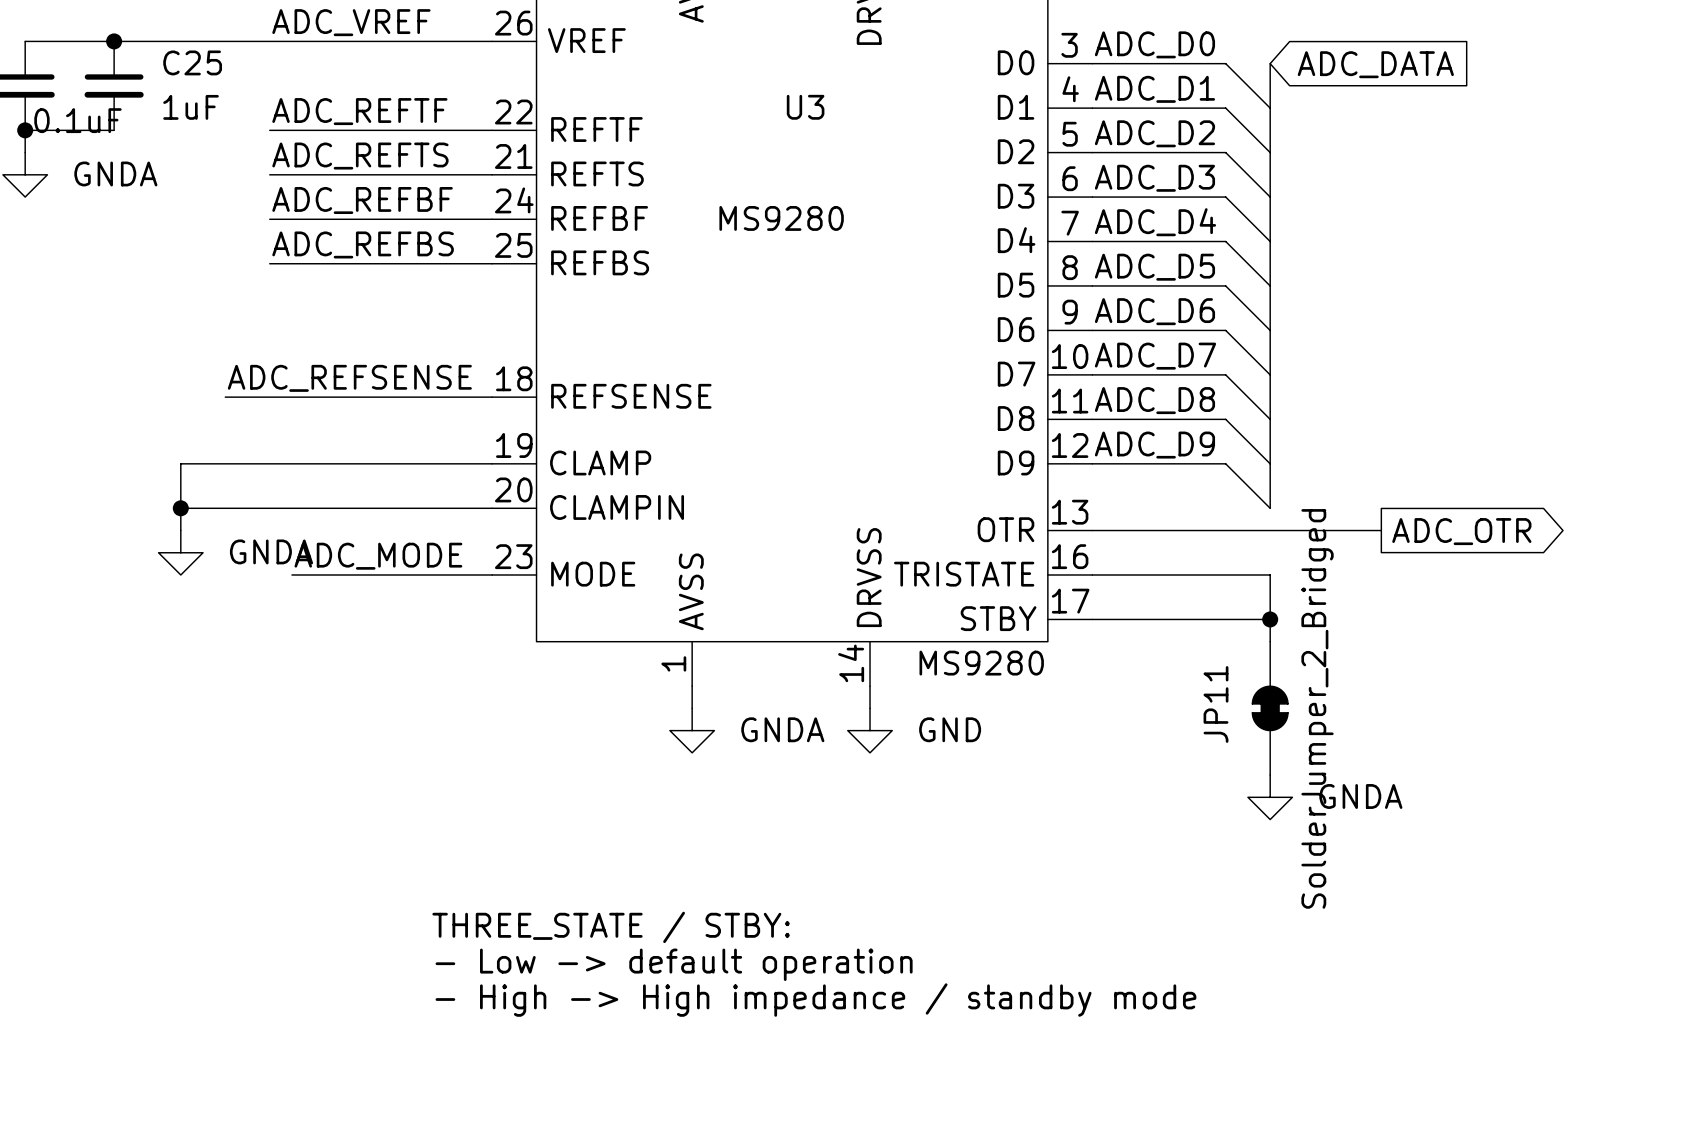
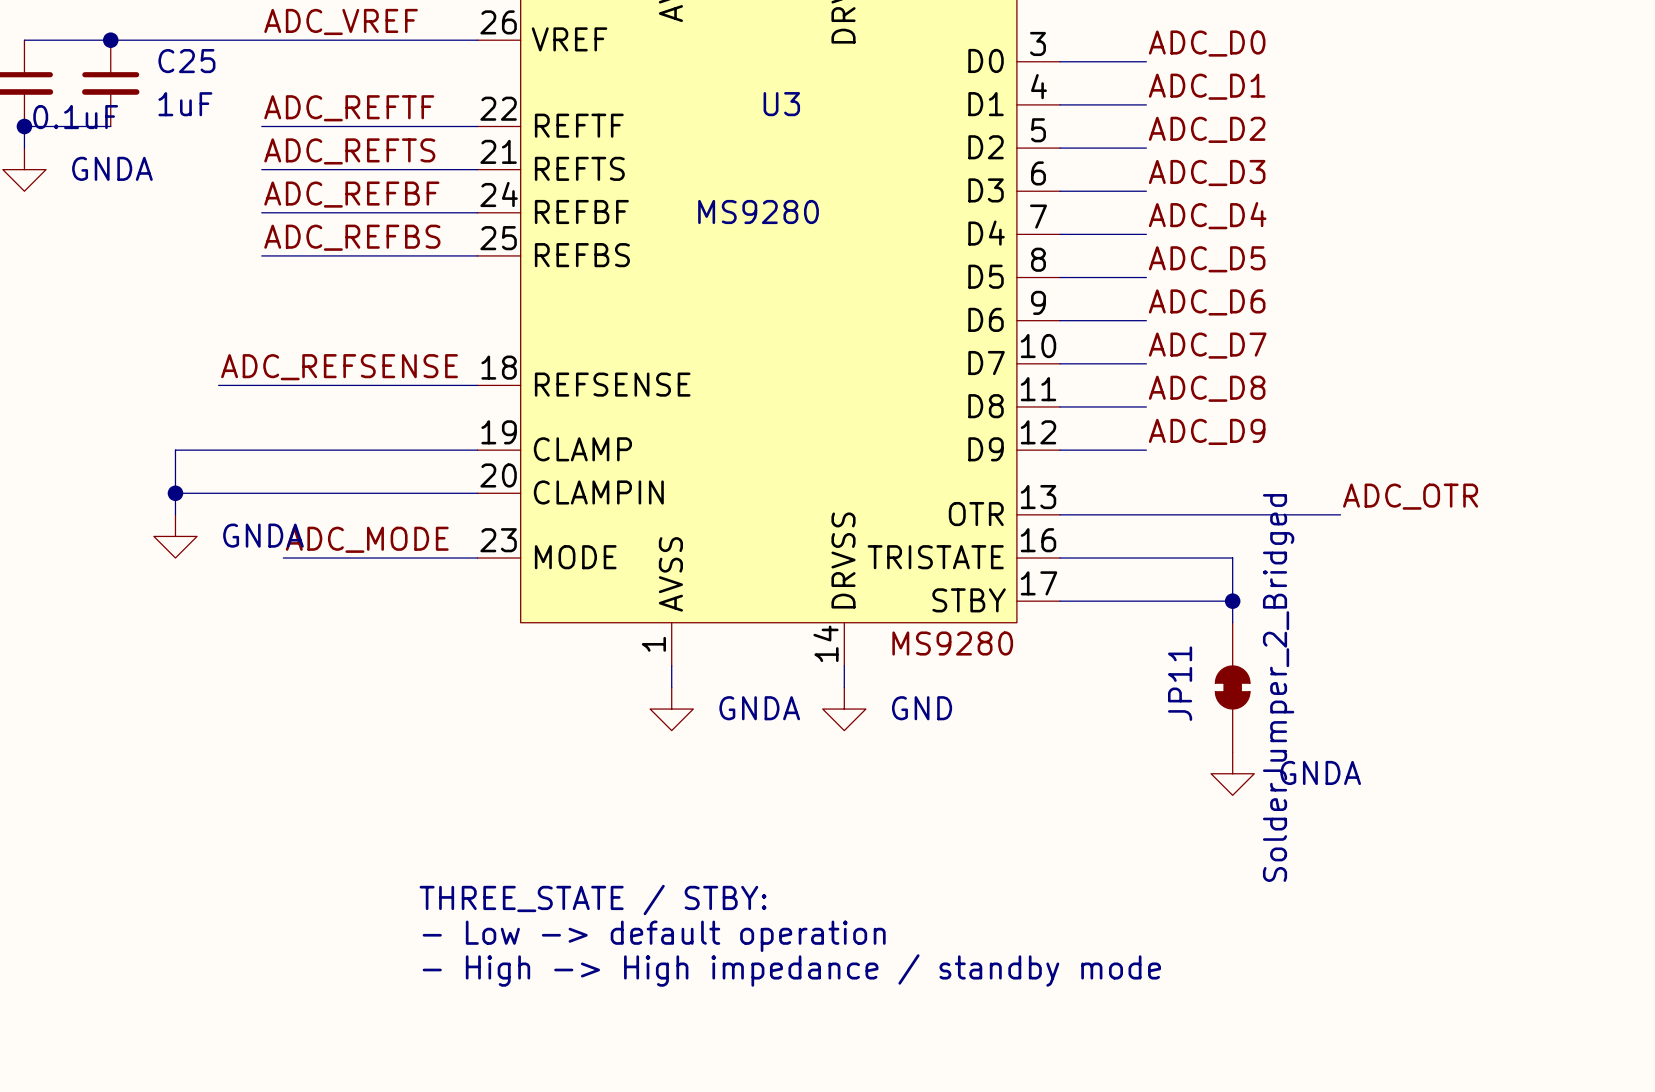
label position: ADC_D0 (1154, 44) -> ADC_D0 (1207, 43)
wire: (1181, 63) (1225, 63) (1270, 108) -> none
bus: (1270, 63) (1270, 508) -> none
global label: ADC_DATA (1375, 64) -> none
label position: ADC_D1 (1154, 89) -> ADC_D1 (1207, 86)
wire: (1181, 108) (1225, 108) (1270, 152) -> none
label position: ADC_D2 (1154, 133) -> ADC_D2 (1207, 129)
wire: (1181, 152) (1225, 152) (1270, 197) -> none
label position: ADC_D3 (1154, 178) -> ADC_D3 (1207, 173)
wire: (1181, 197) (1225, 197) (1270, 241) -> none
label position: ADC_D4 (1155, 222) -> ADC_D4 (1207, 215)
wire: (1181, 241) (1225, 241) (1270, 285) -> none
label position: ADC_D5 (1154, 267) -> ADC_D5 (1207, 259)
wire: (1181, 285) (1225, 285) (1270, 330) -> none
label position: ADC_D6 (1154, 311) -> ADC_D6 (1207, 302)
wire: (1181, 330) (1225, 330) (1270, 374) -> none
label position: ADC_D7 (1155, 356) -> ADC_D7 (1207, 345)
wire: (1181, 374) (1225, 374) (1270, 419) -> none
label position: ADC_D8 (1154, 400) -> ADC_D8 (1207, 388)
wire: (1181, 419) (1225, 419) (1270, 463) -> none
label position: ADC_D9 (1154, 445) -> ADC_D9 (1207, 431)
wire: (1181, 463) (1225, 463) (1270, 508) -> none
label: none -> ADC_OTR (1410, 496)
global label: ADC_OTR (1461, 531) -> none

